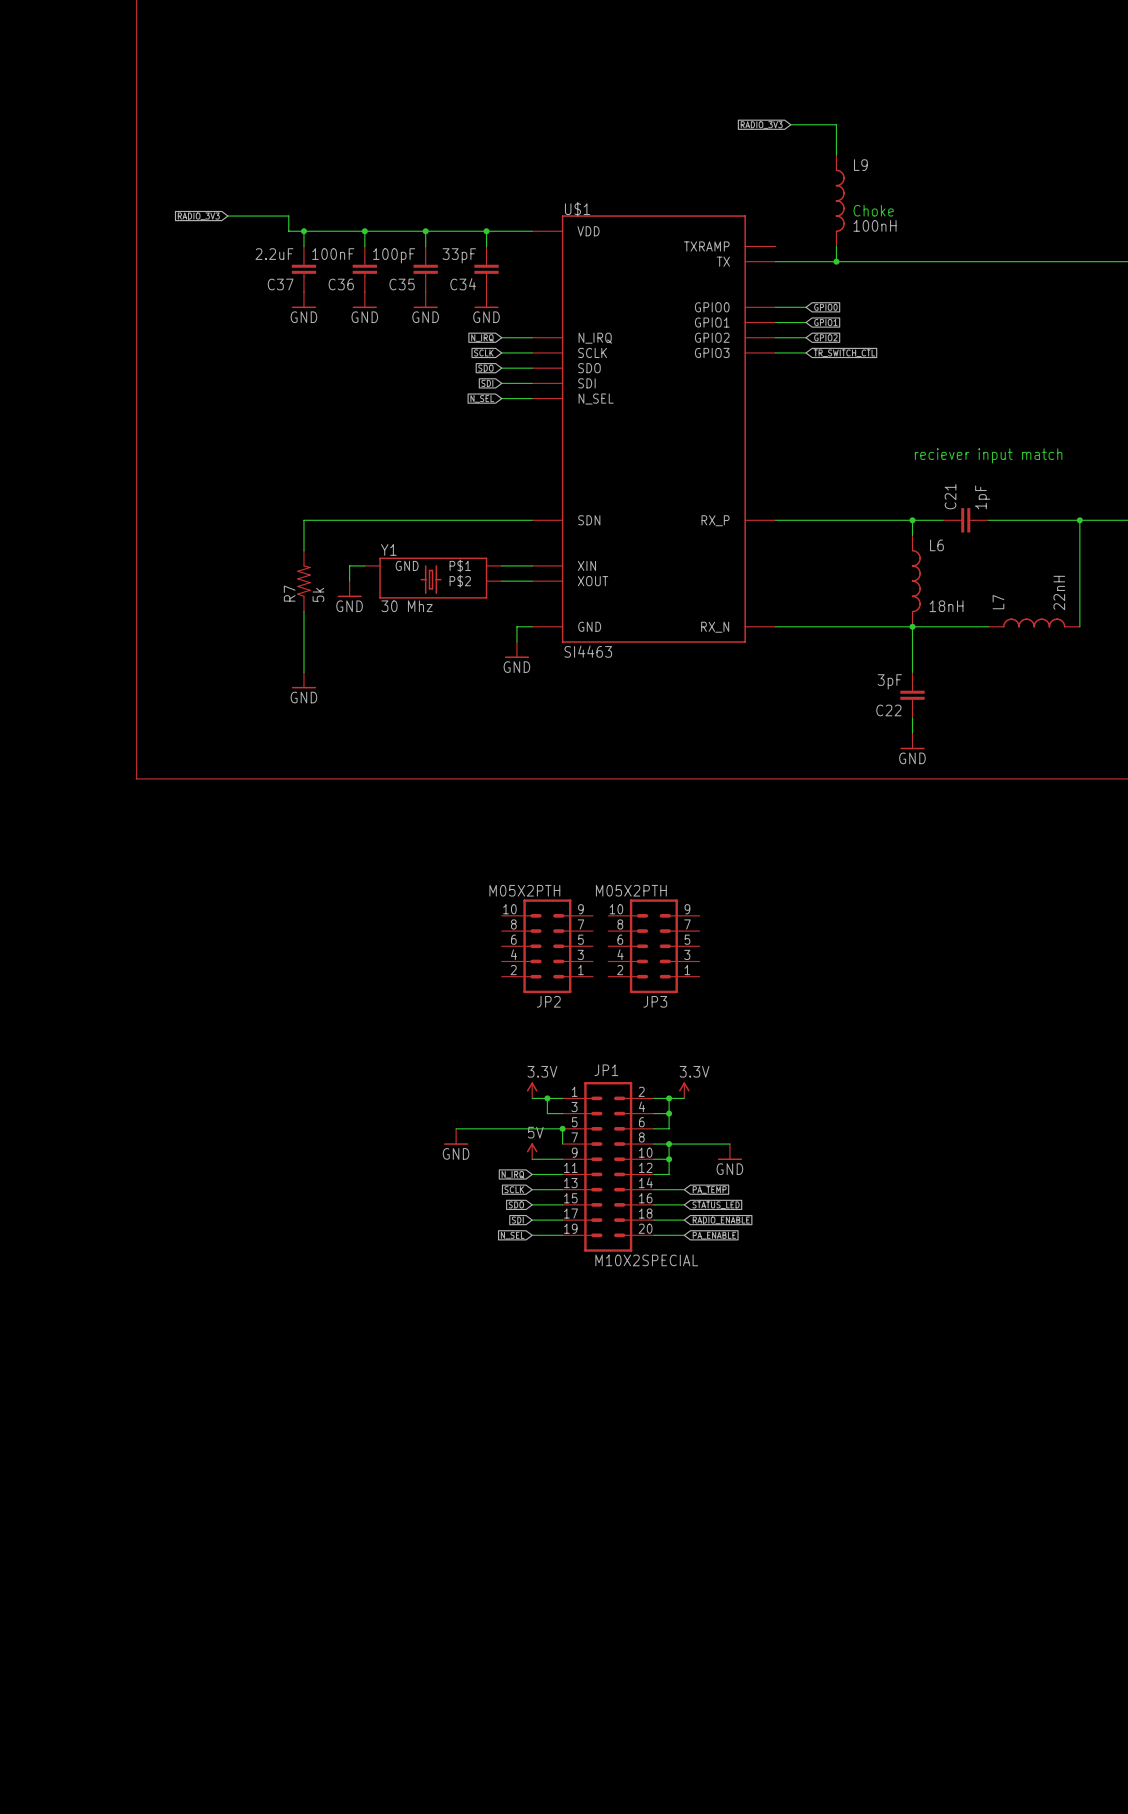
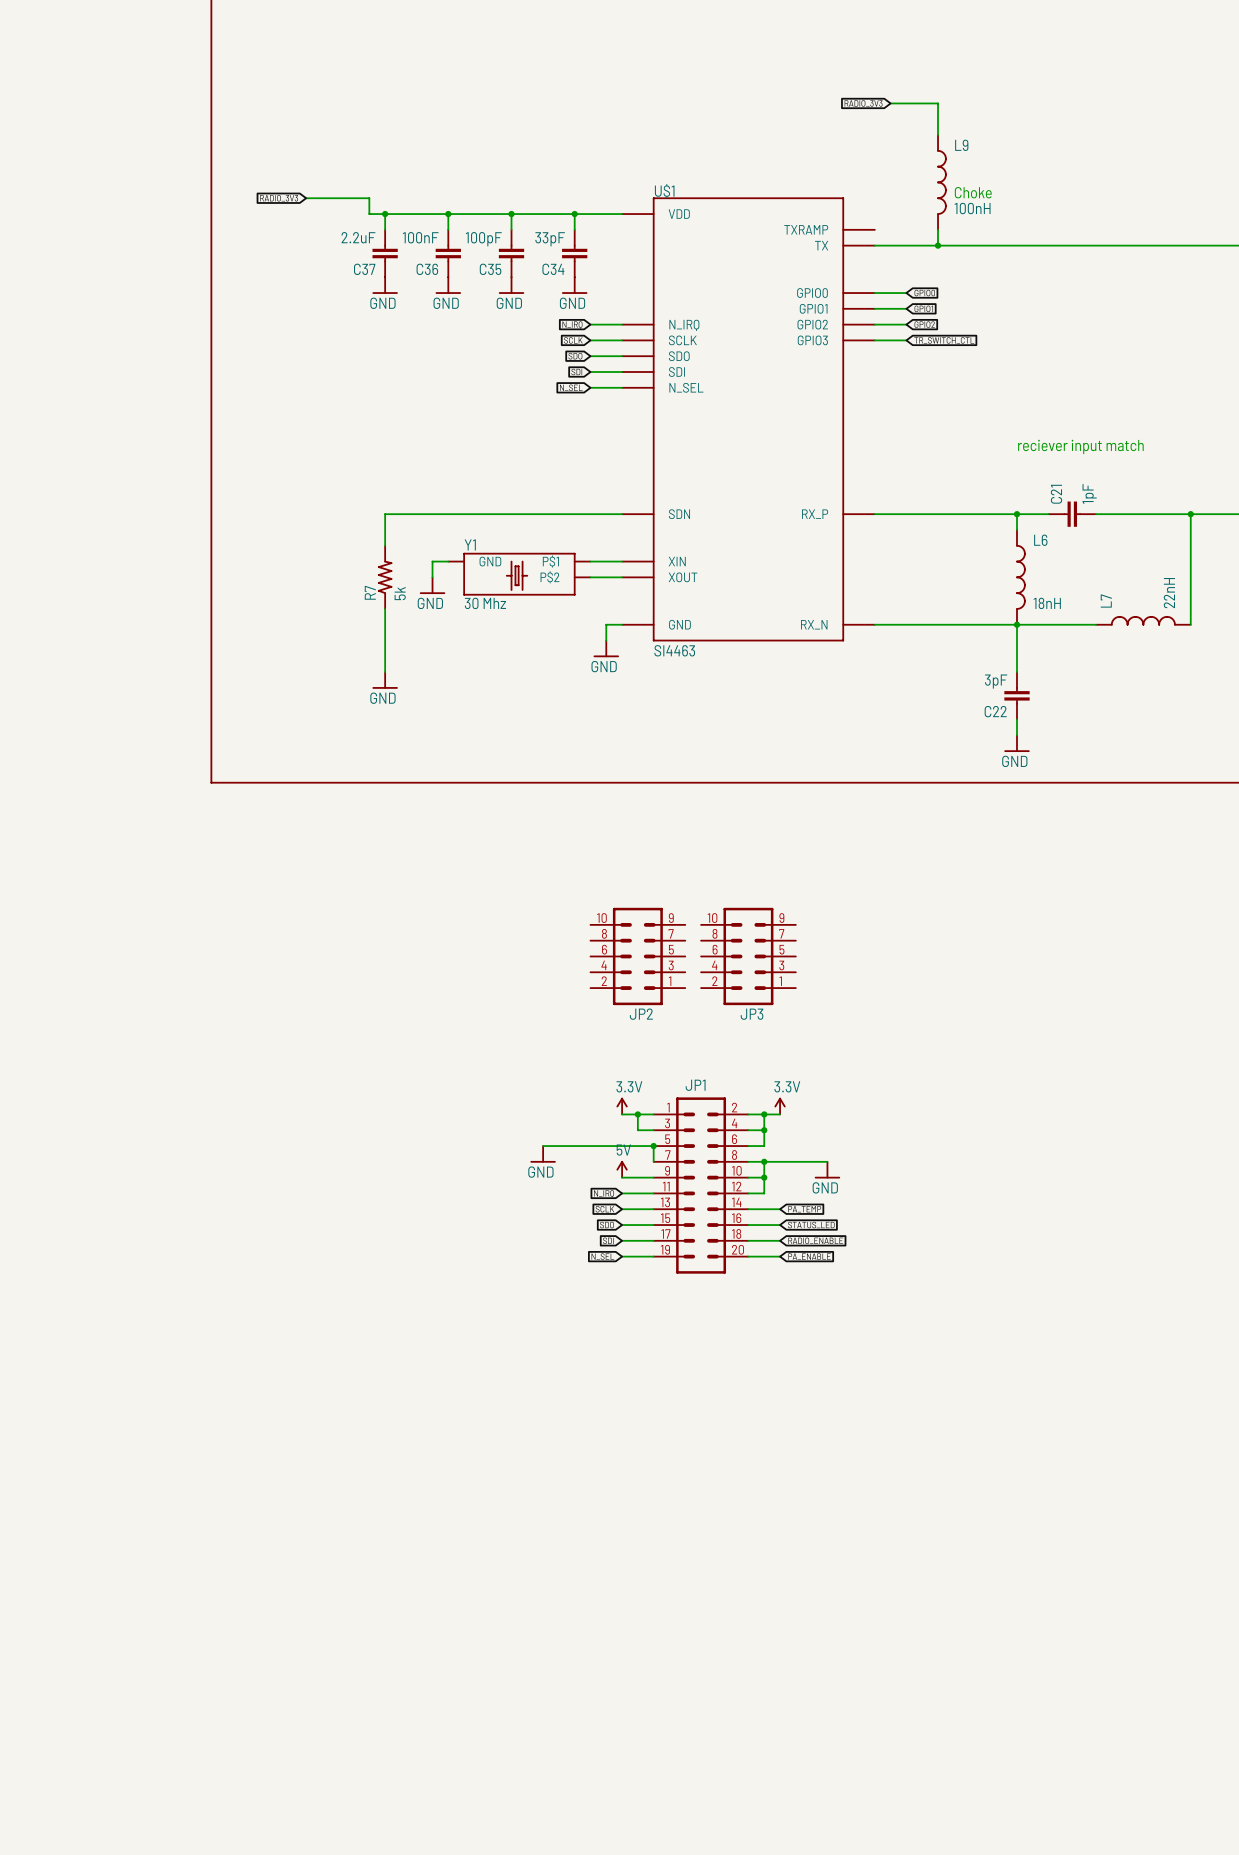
JP2 value: M05X2PTH (524, 890) -> none
JP3 value: M05X2PTH (631, 890) -> none
JP1 value: M10X2SPECIAL (646, 1260) -> none

